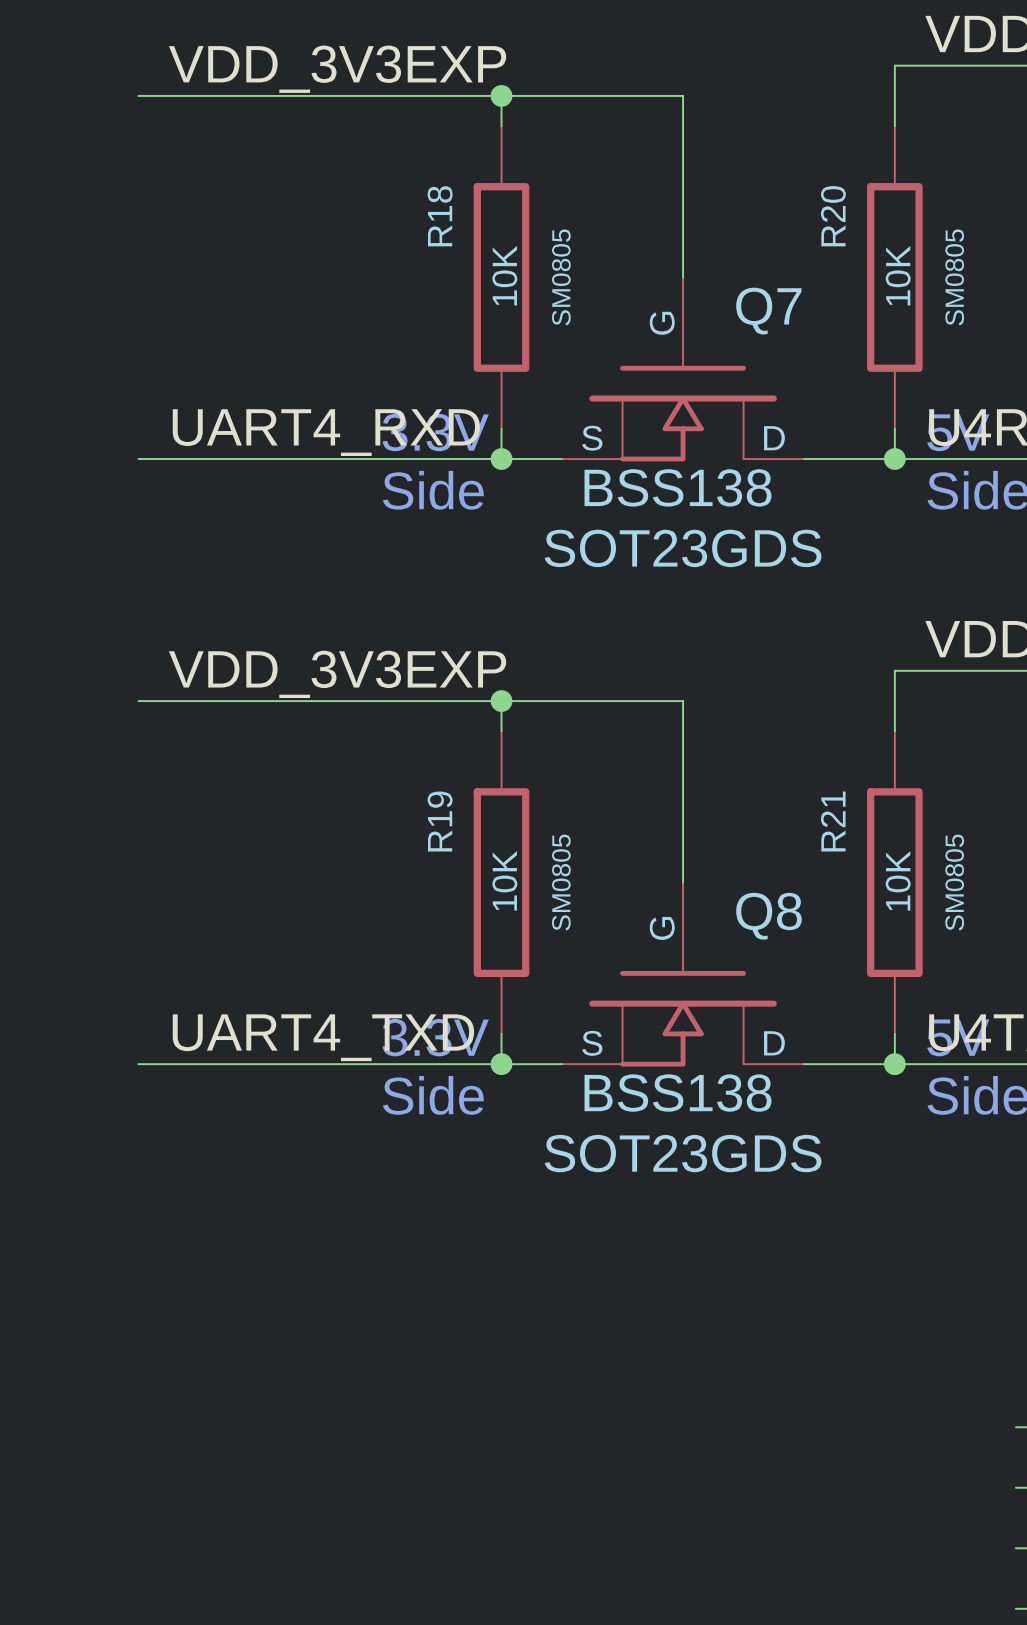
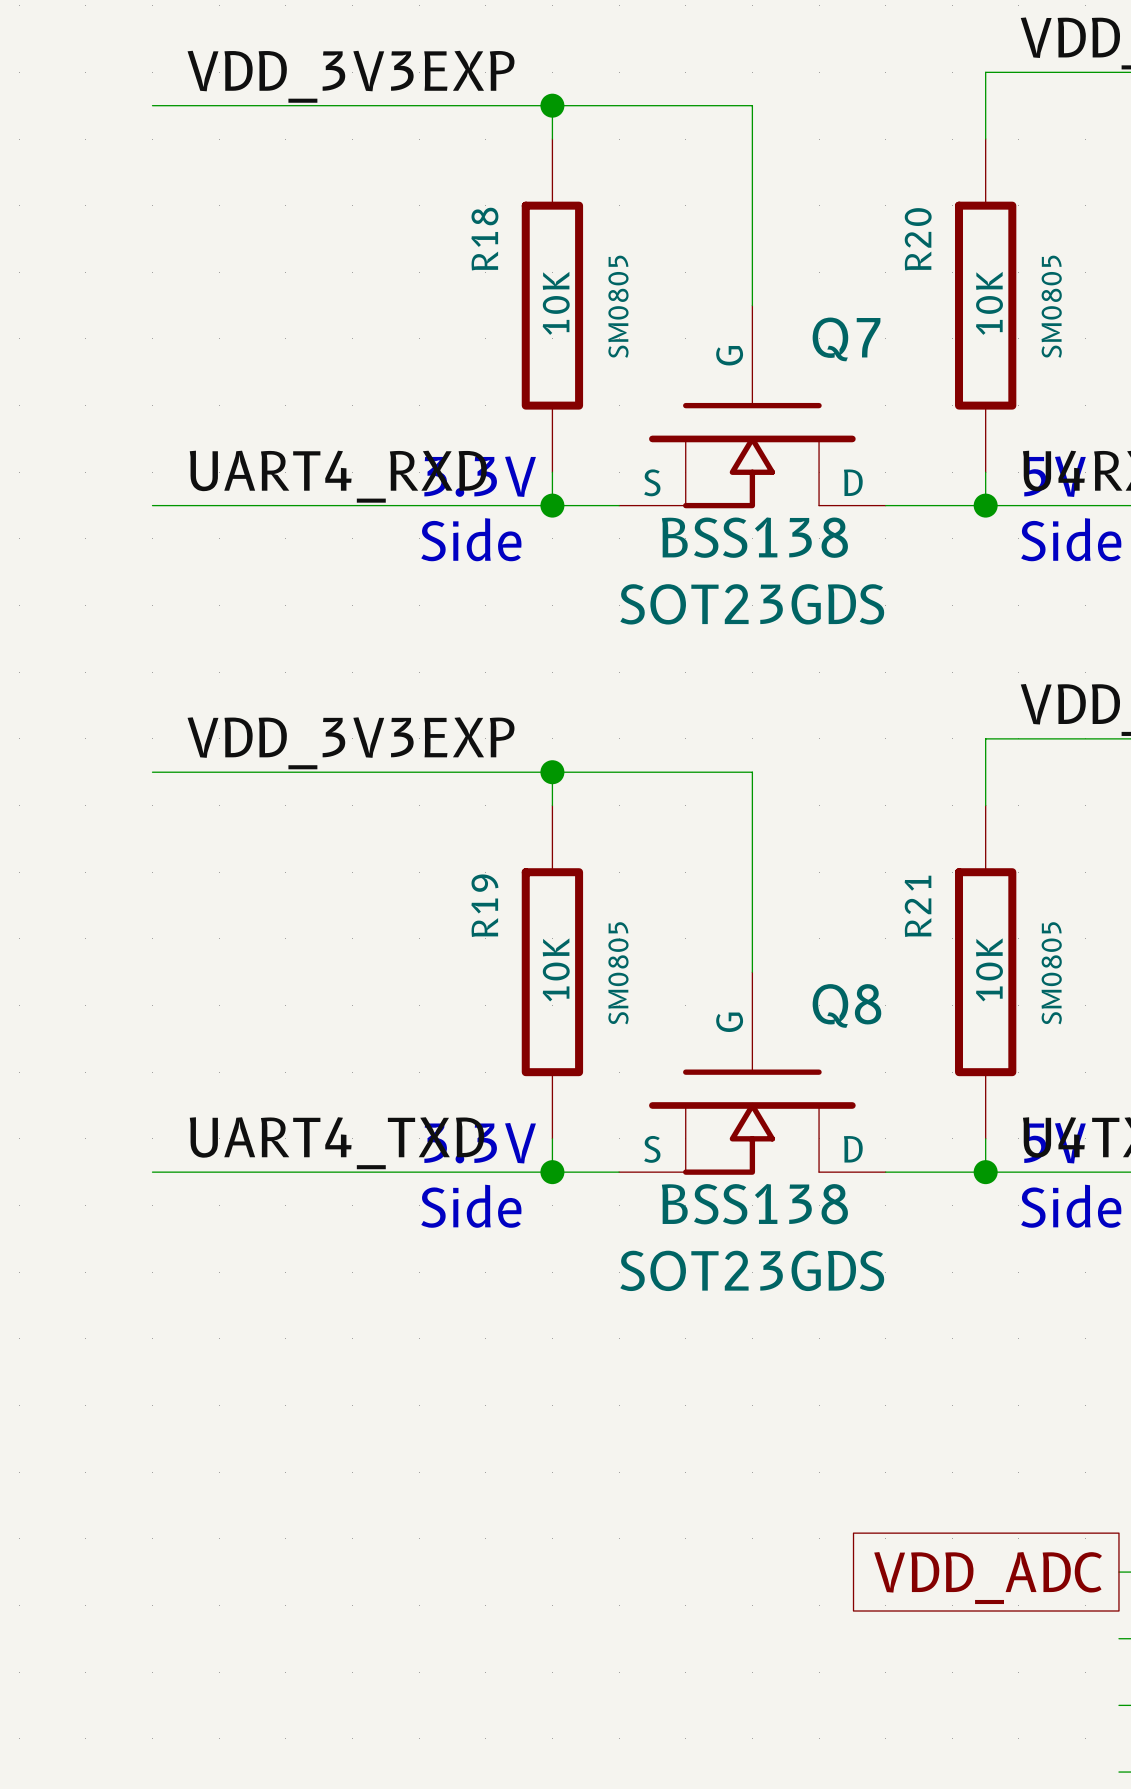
global label: none -> VDD_ADC (988, 1578)

